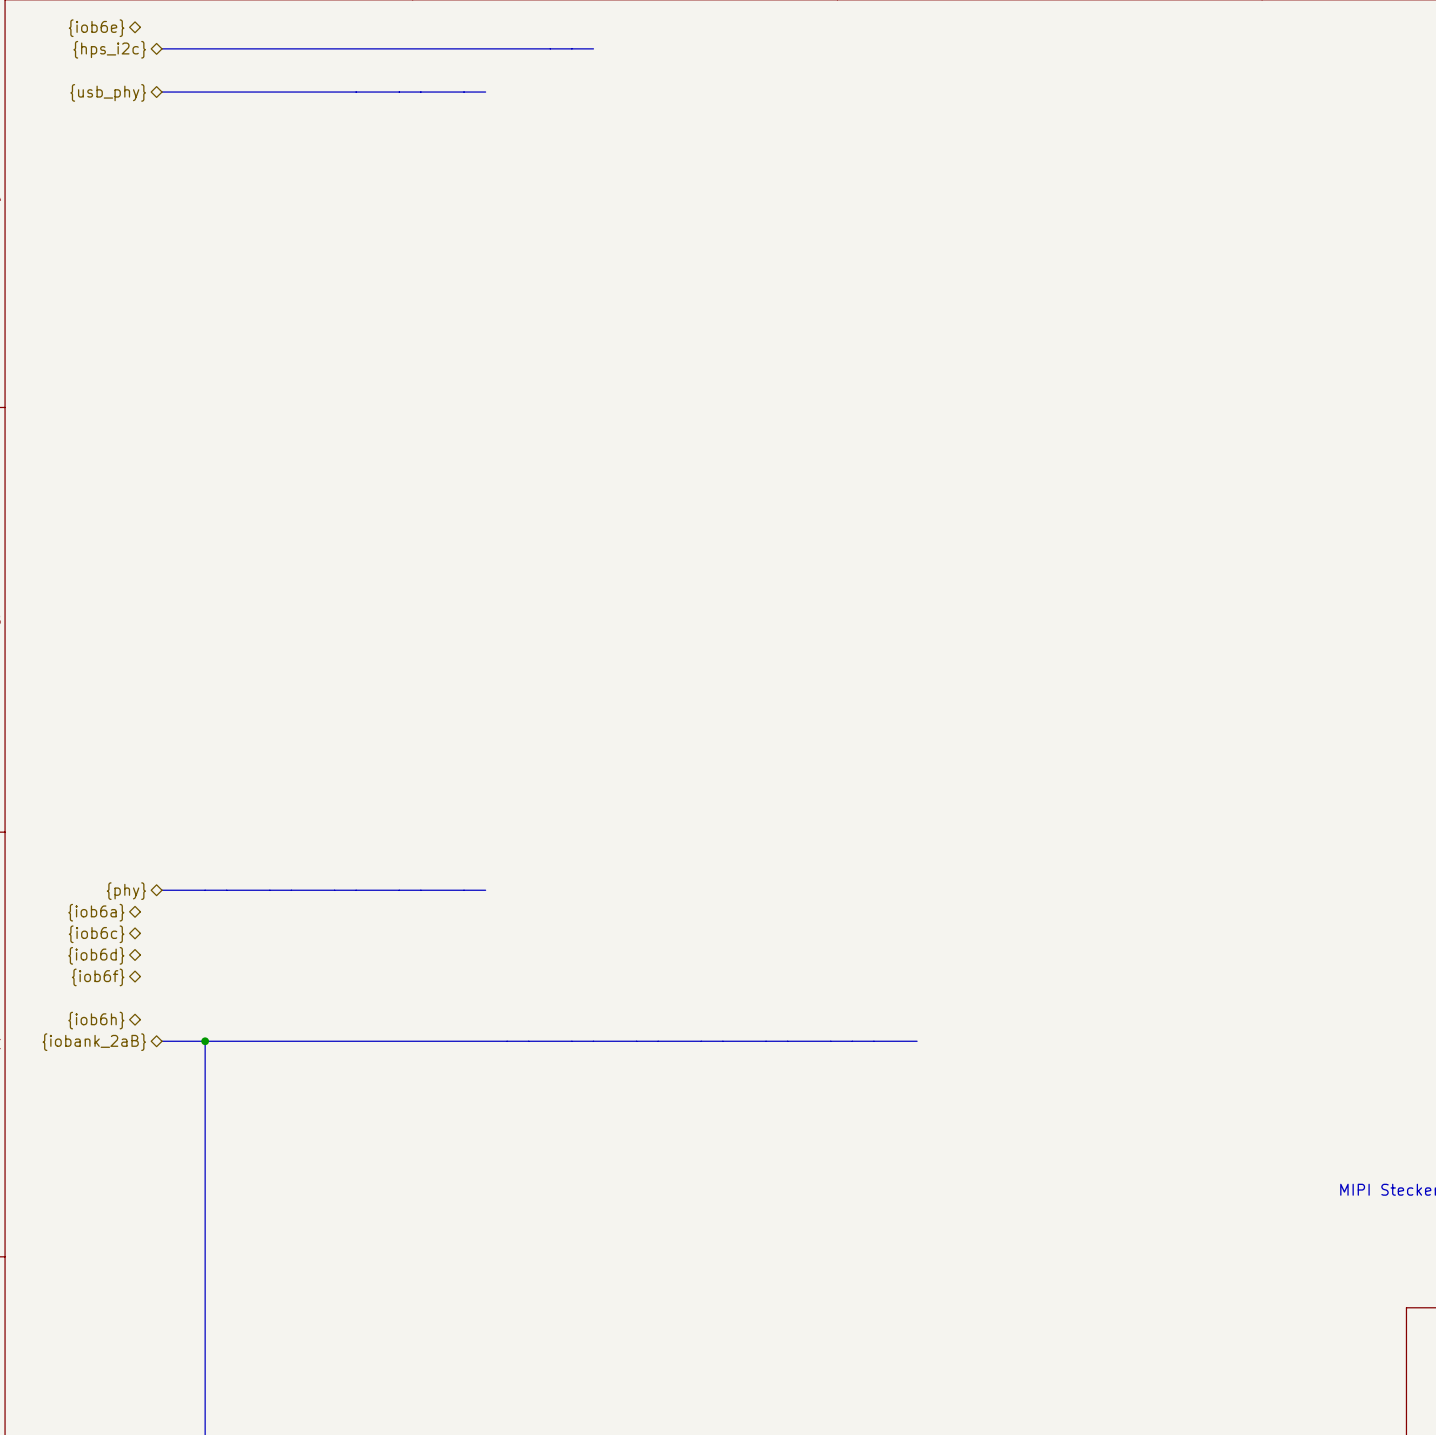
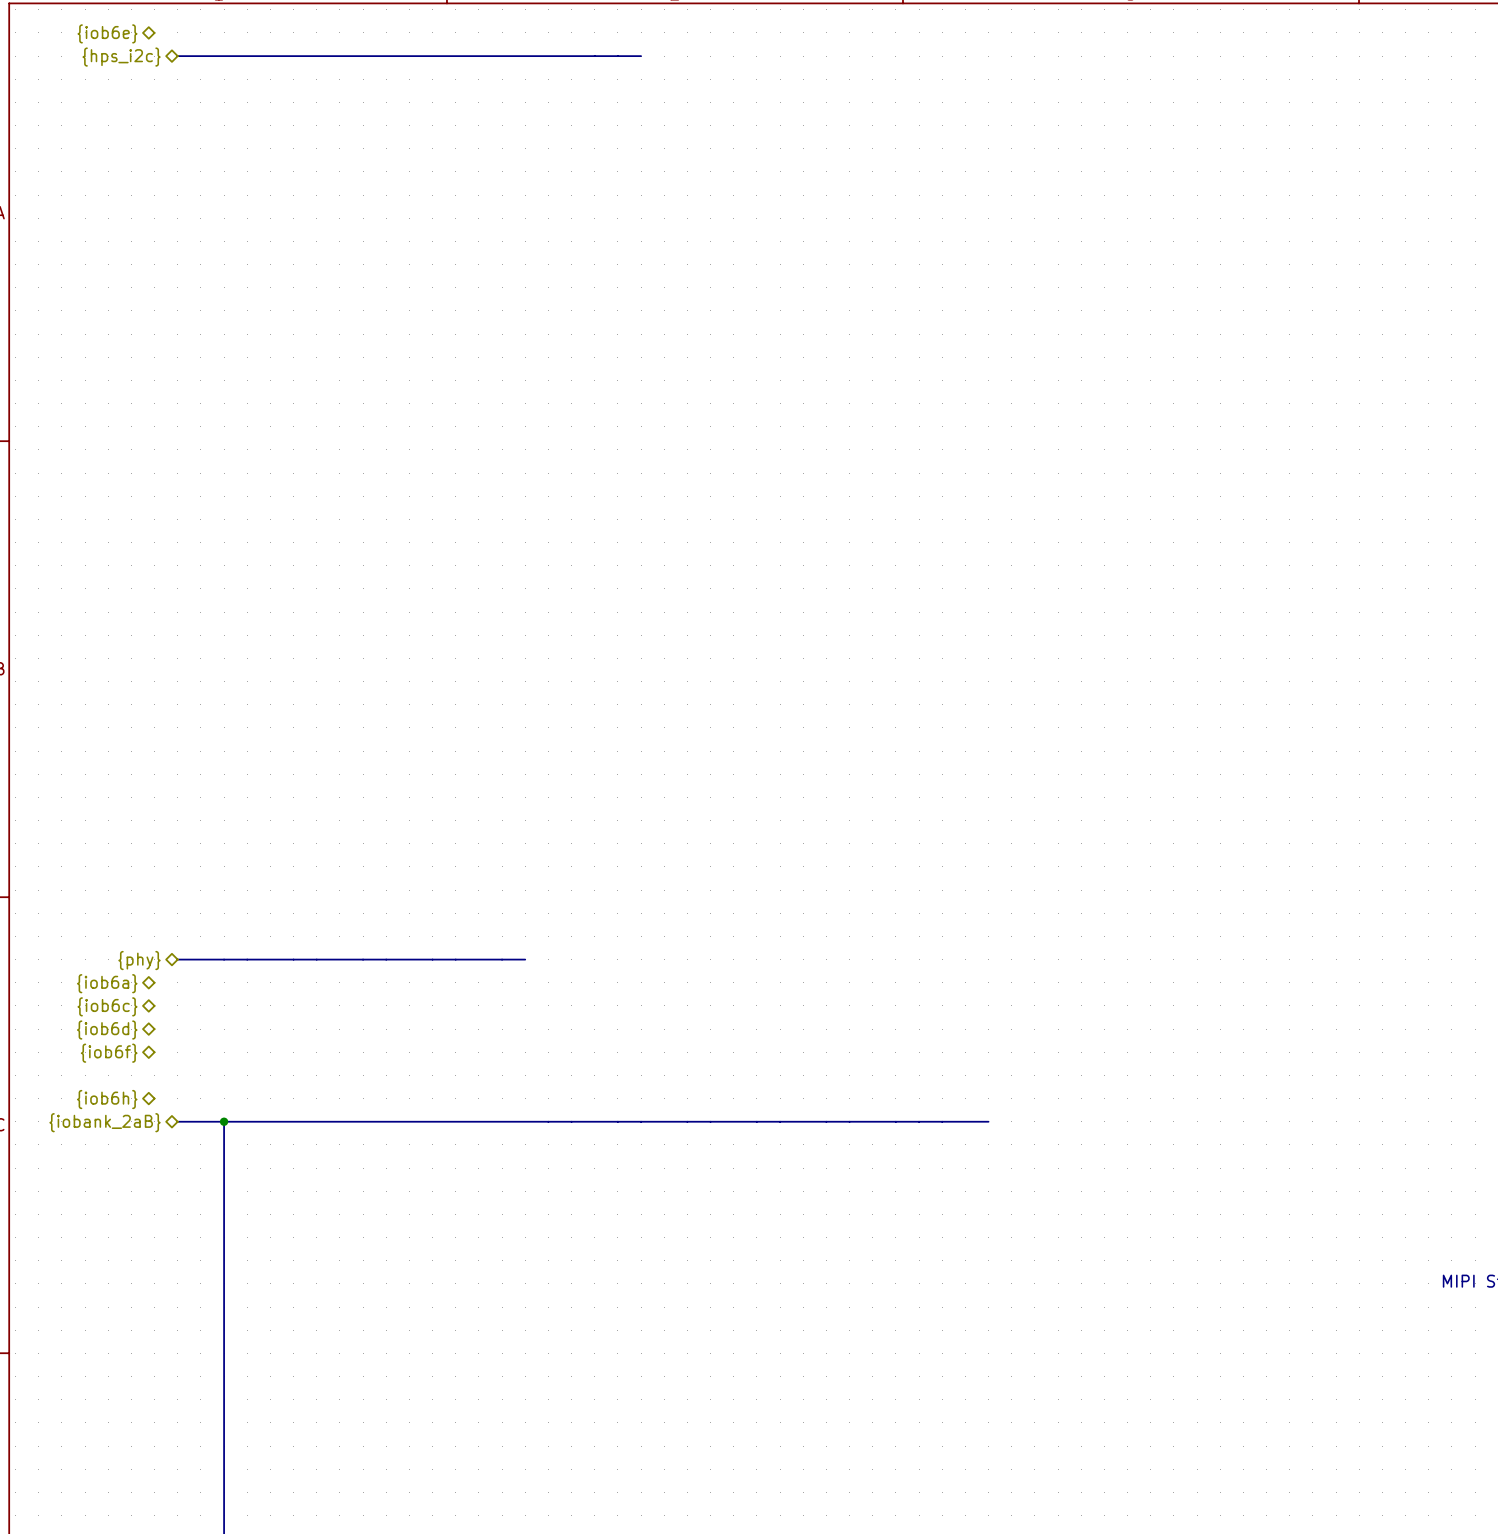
hierarchical label: {usb_phy} (108, 92) -> none
bus: (162, 92) (485, 92) -> none

